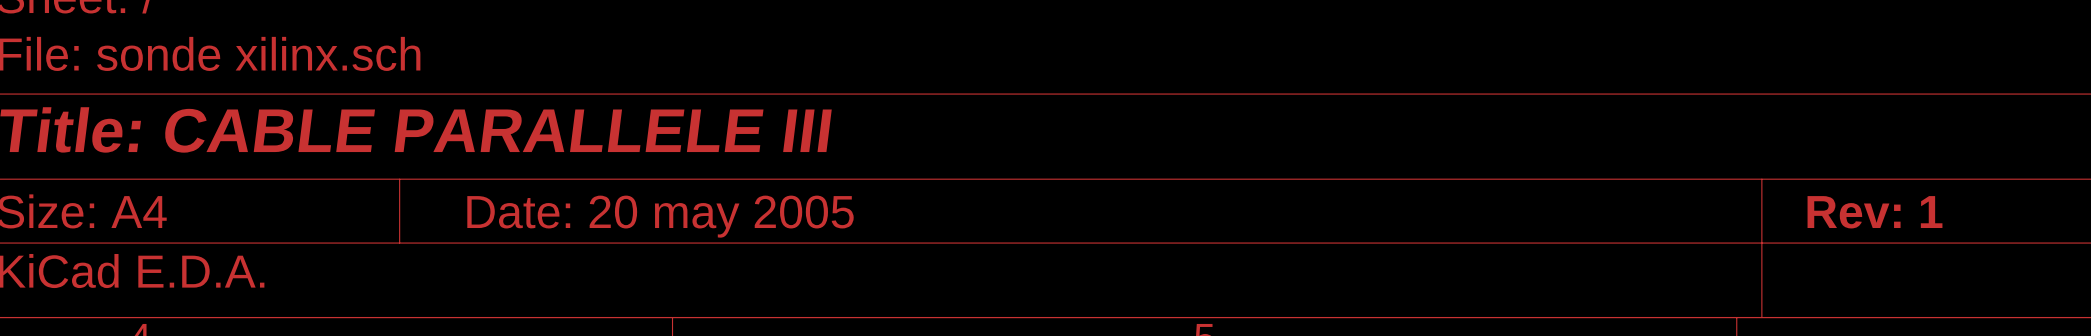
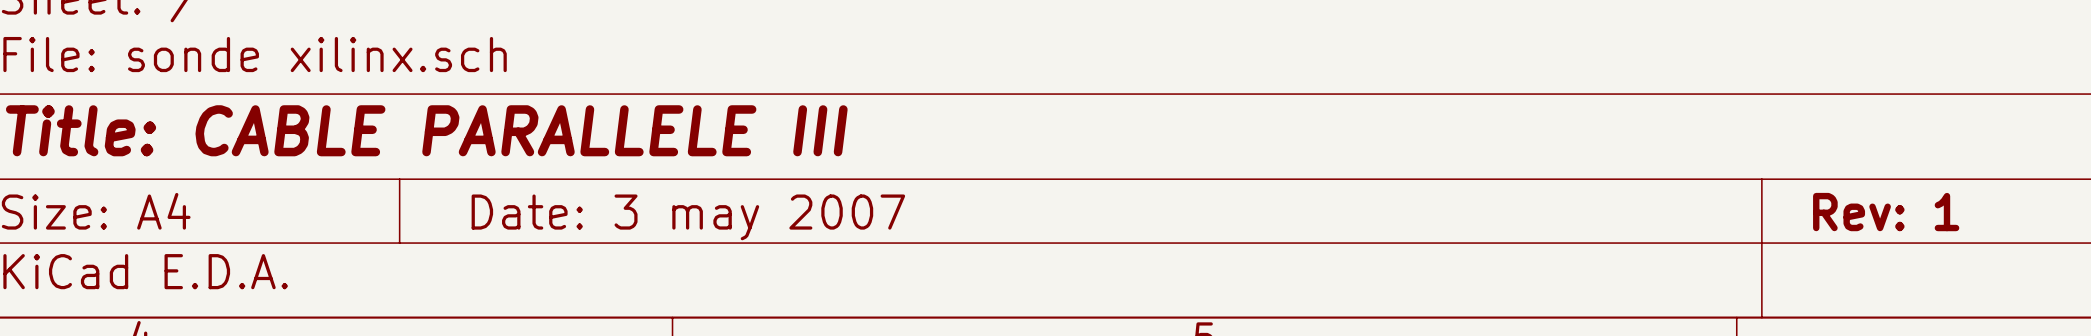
title block: Date: 20 may 2005 (660, 216) -> Date: 3 may 2007 (688, 217)

